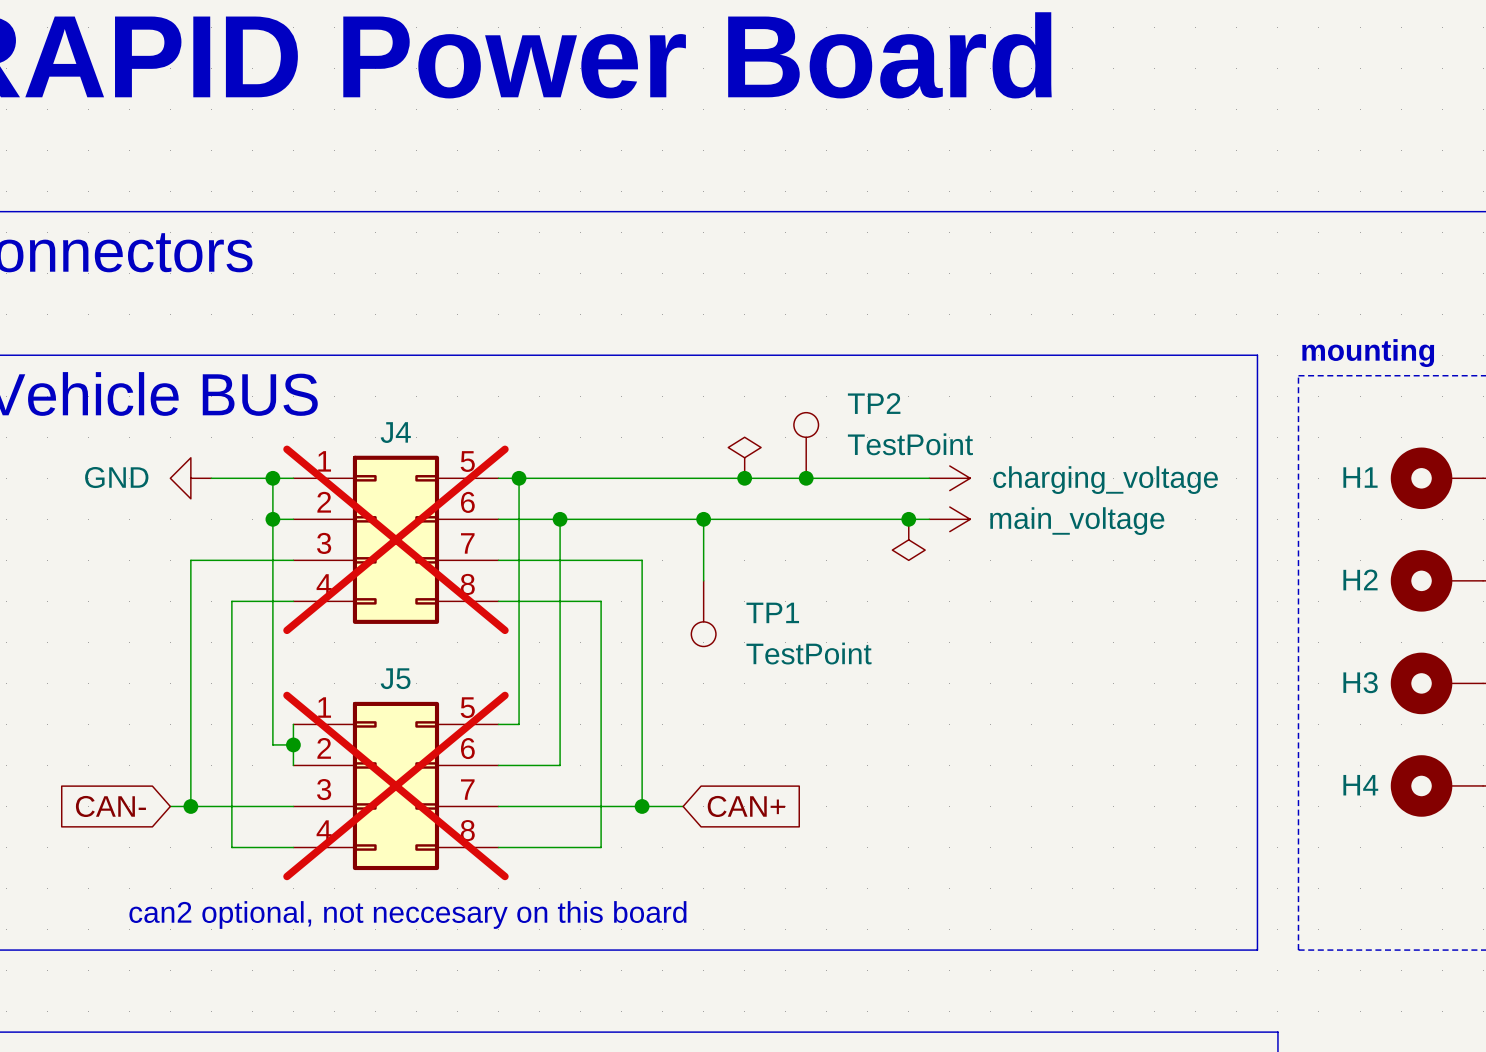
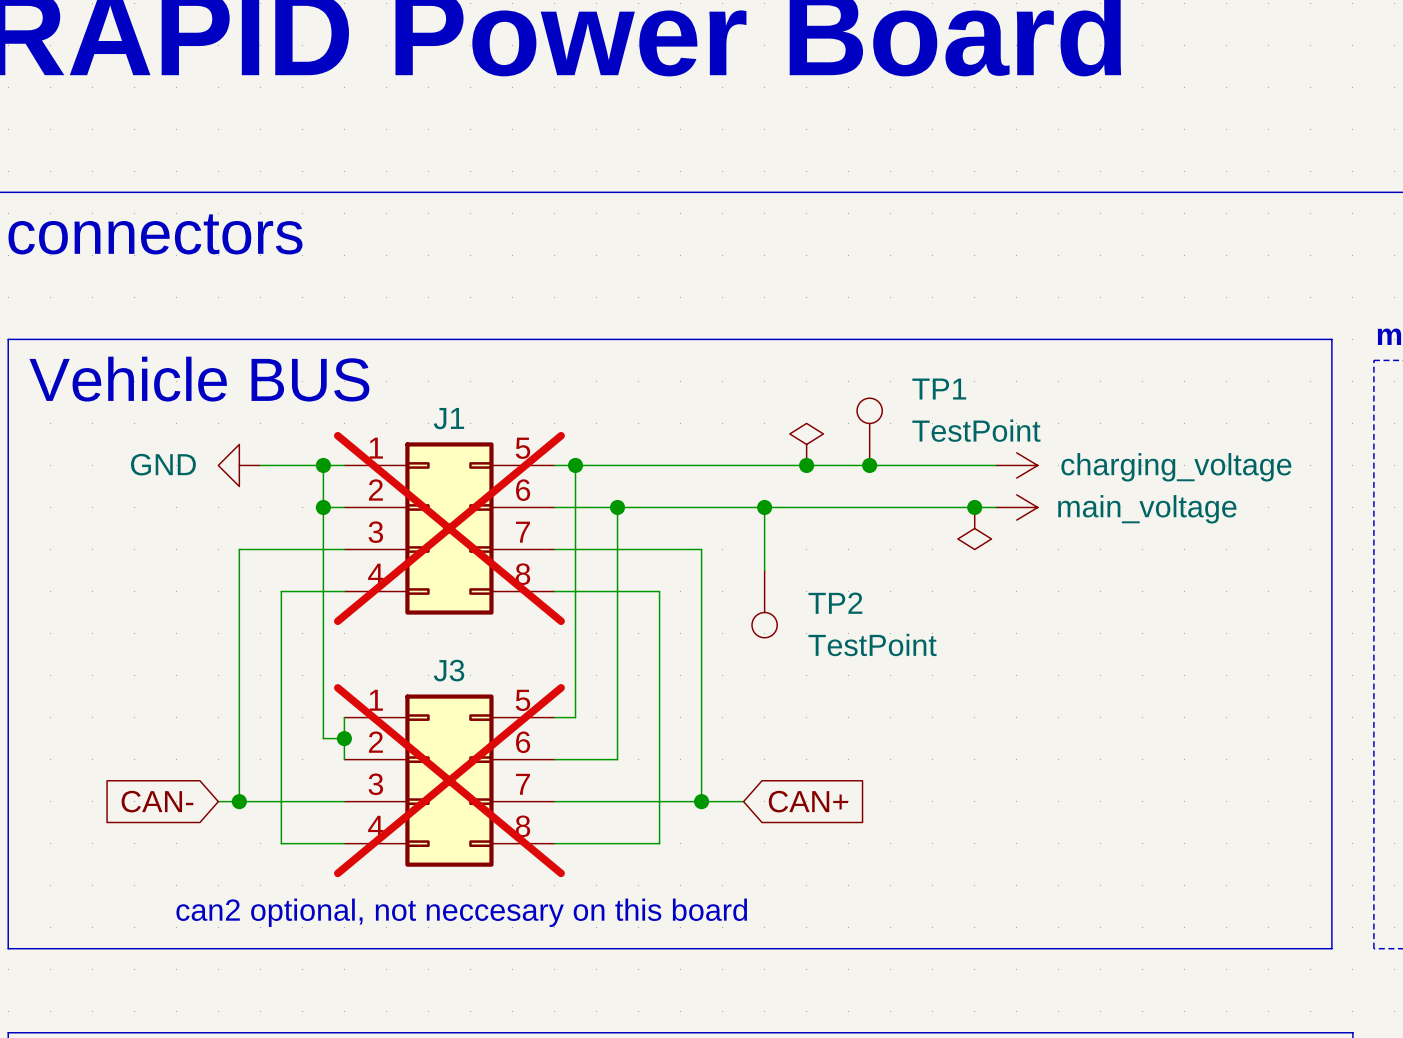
TP2 name: TP2 (874, 403) -> TP1 (939, 389)
J4 name: J4 (395, 432) -> J1 (448, 418)
TP1 name: TP1 (772, 612) -> TP2 (835, 603)
J5 name: J5 (395, 678) -> J3 (449, 670)

